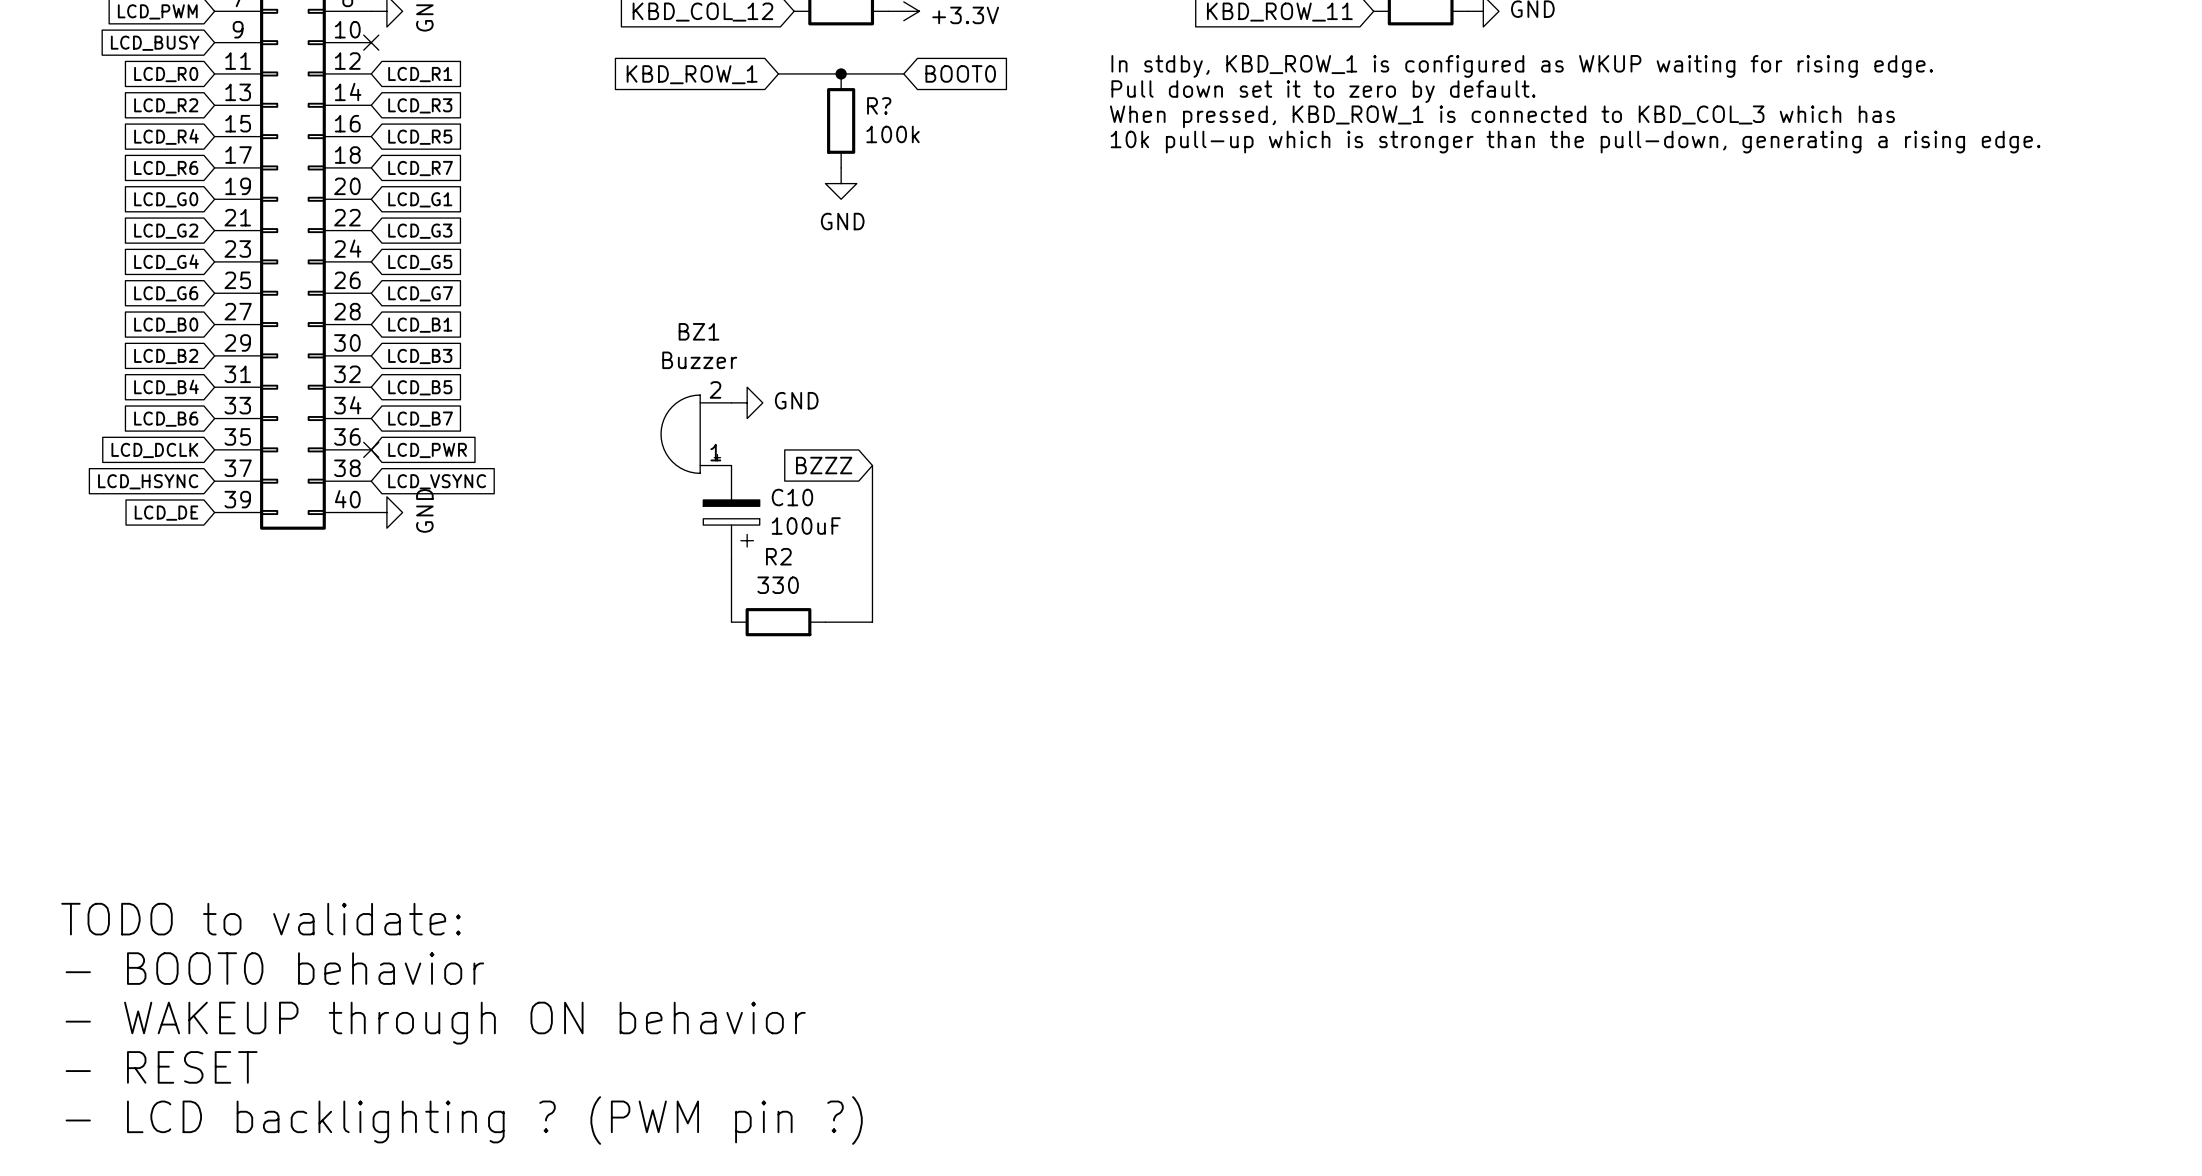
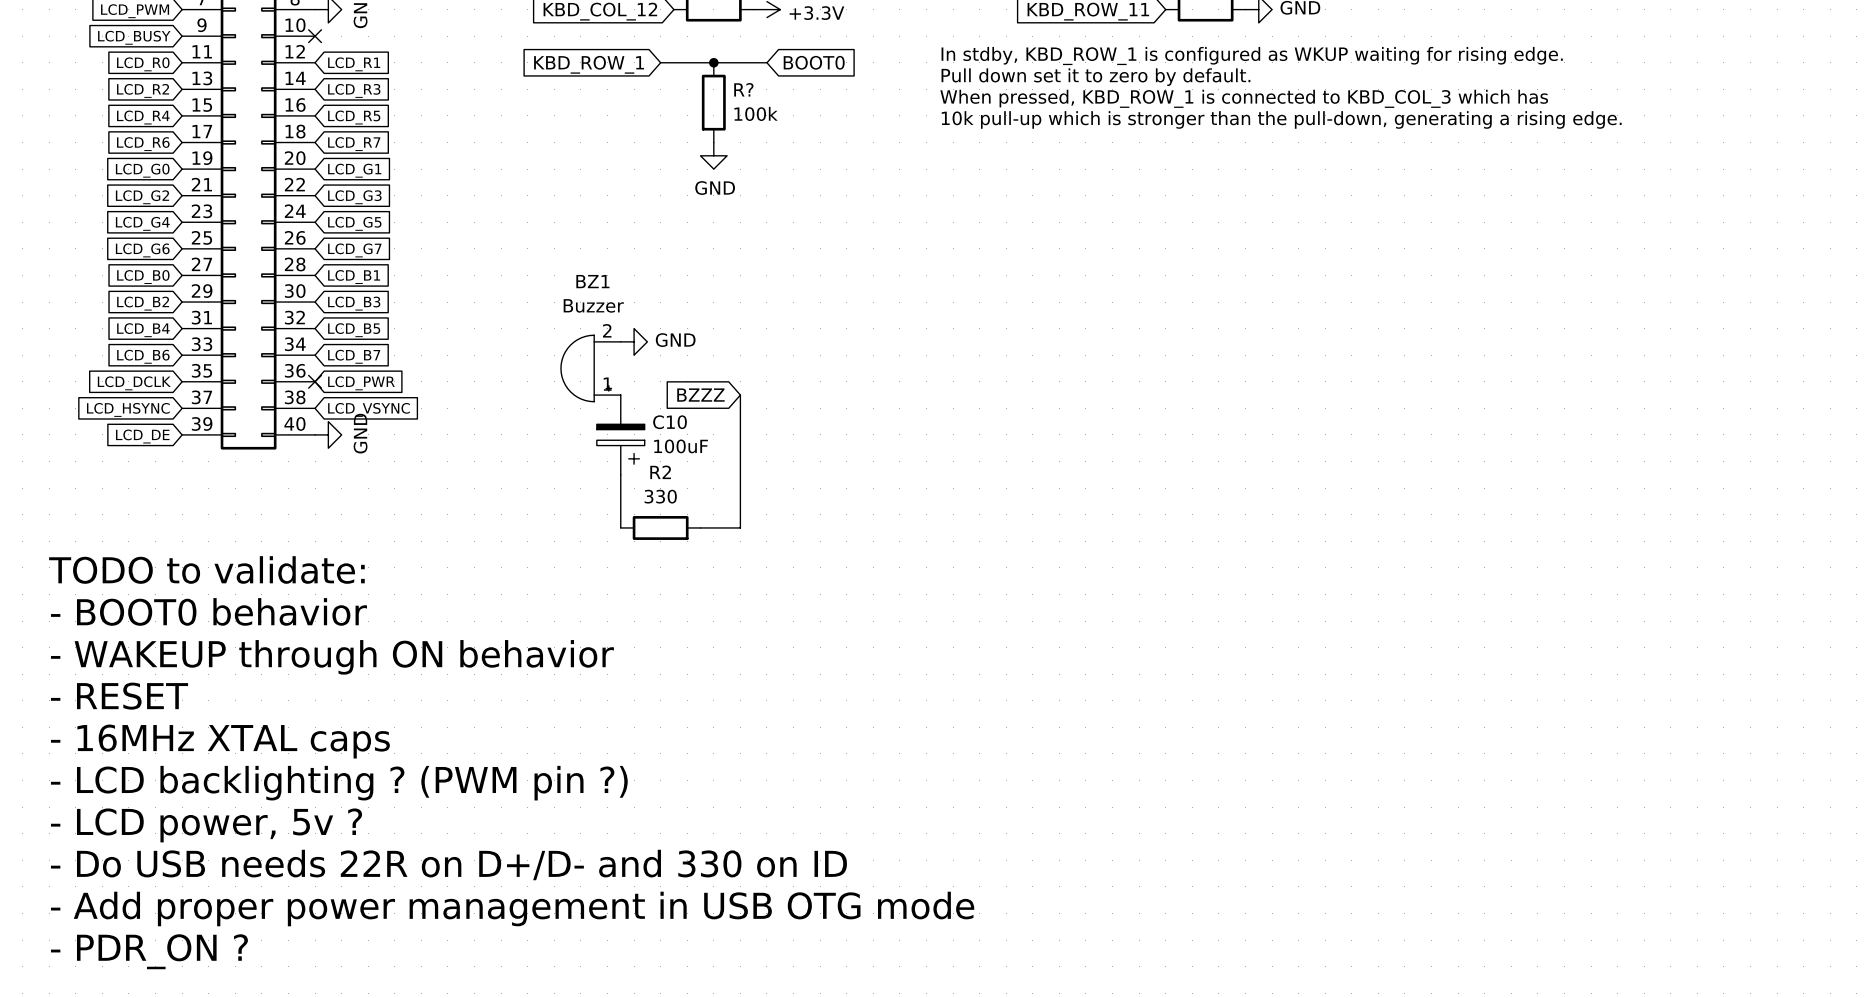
text: none -> TODO to validate: (206, 569)
text: none -> - BOOT0 behavior (208, 611)
text: none -> - WAKEUP through ON behavior (332, 657)
text: none -> - RESET (119, 696)
text: none -> - 16MHz XTAL caps (220, 741)
text: TODO to validate: (260, 919) -> - LCD backlighting ? (PWM pin ?) (339, 783)
text: - BOOT0 behavior (274, 968) -> - LCD power, 5v ? (206, 825)
text: - WAKEUP through ON behavior (435, 1023) -> - Do USB needs 22R on D+/D- and 330 on ID (448, 864)
text: - RESET (161, 1067) -> - Add proper power management in USB OTG mode (512, 909)
text: - LCD backlighting ? (PWM pin ?) (464, 1120) -> - PDR_ON ? (149, 951)

